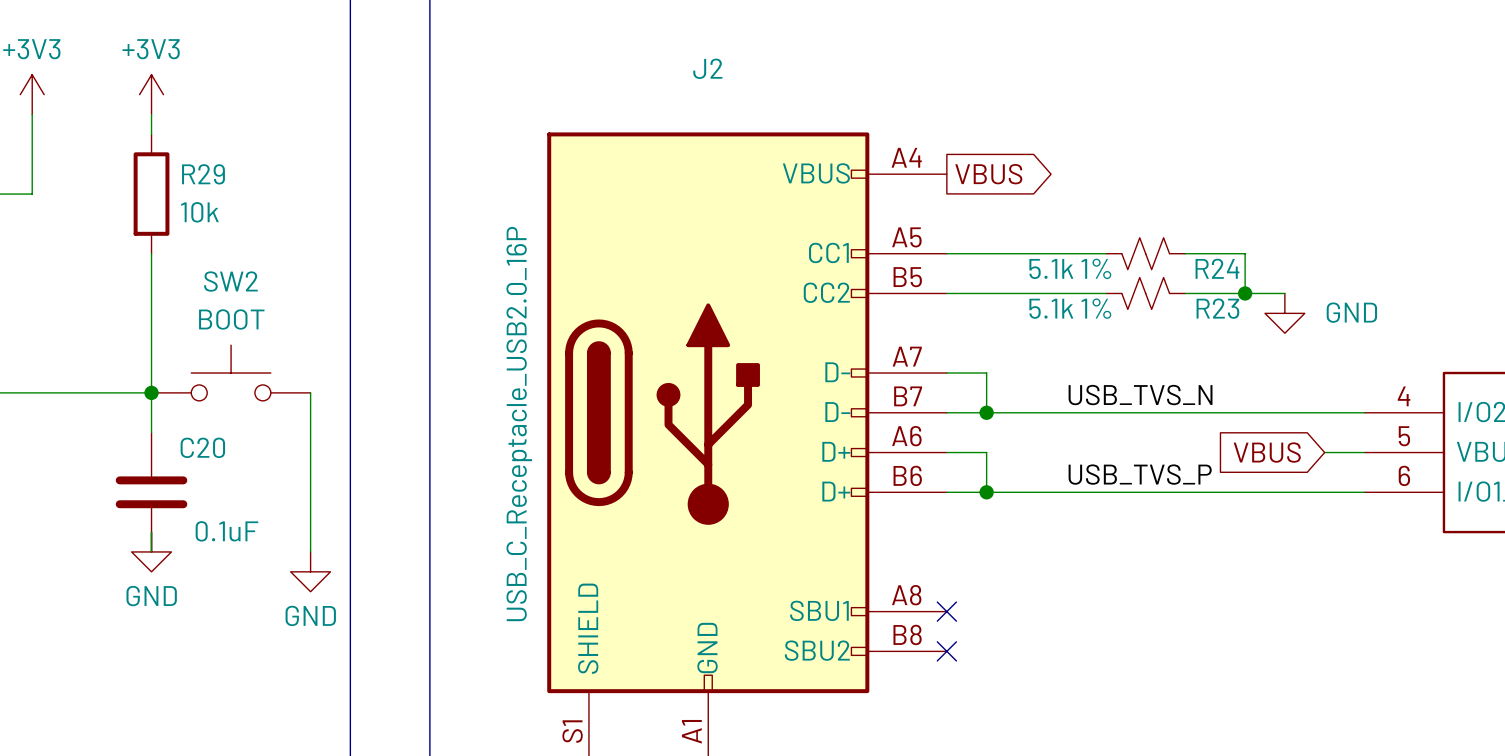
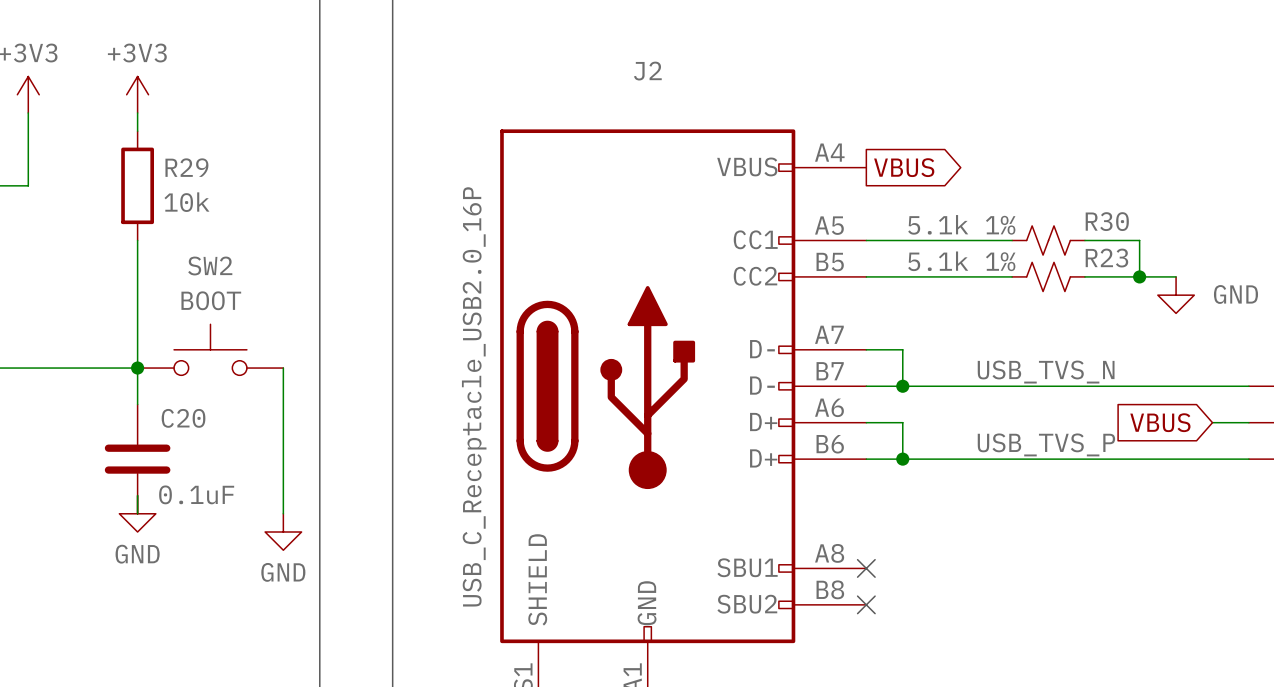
R24: 5.1k 1% (1145, 253) -> none
R30: none -> 5.1k 1% (1048, 240)
R23 flip: as is (1145, 293) -> left-right (1048, 276)
R23 value position: 5.1k 1% (1070, 308) -> 5.1k 1% (961, 261)
R23 name position: R23 (1217, 308) -> R23 (1106, 258)

